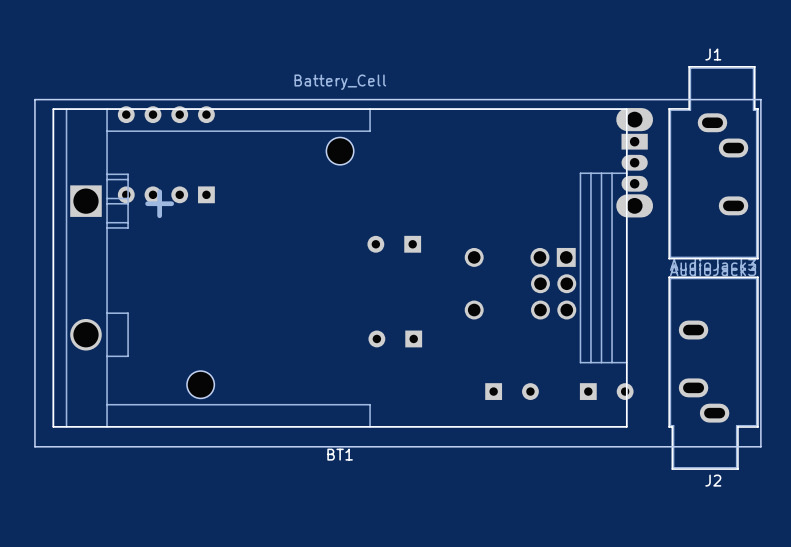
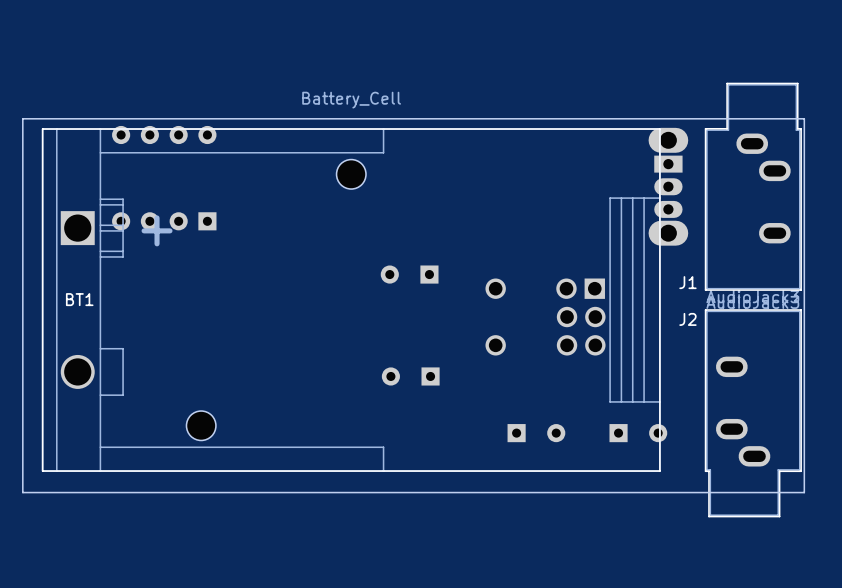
J1 name position: J1 (713, 54) -> J1 (687, 282)
BT1 name position: BT1 (340, 454) -> BT1 (79, 299)
J2 name position: J2 (713, 480) -> J2 (687, 319)

